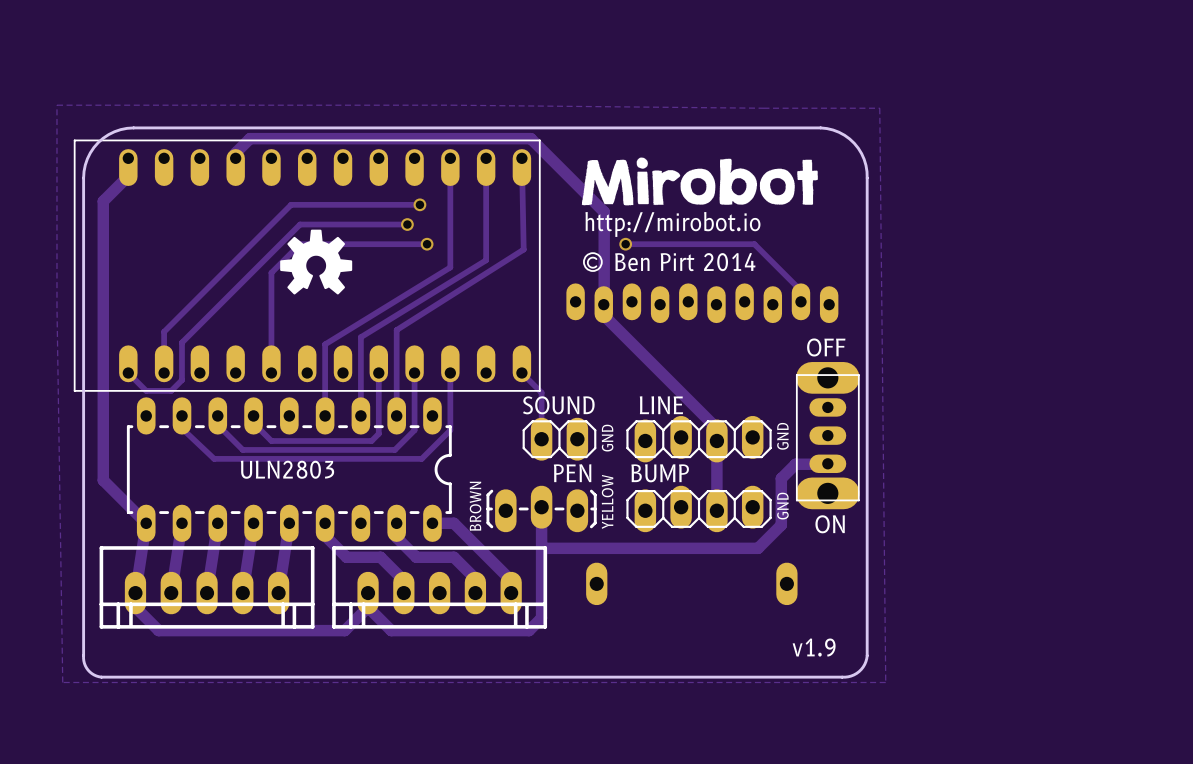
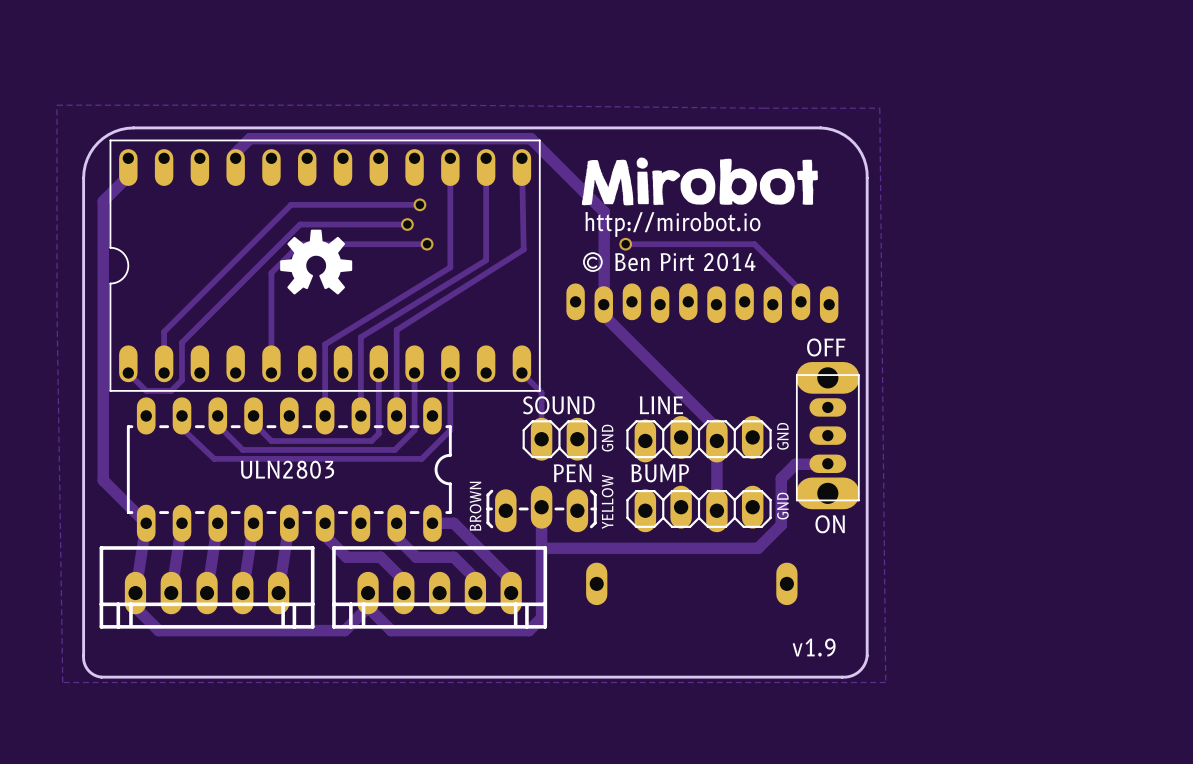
part: (307, 265) -> none
part: none -> (325, 265)

